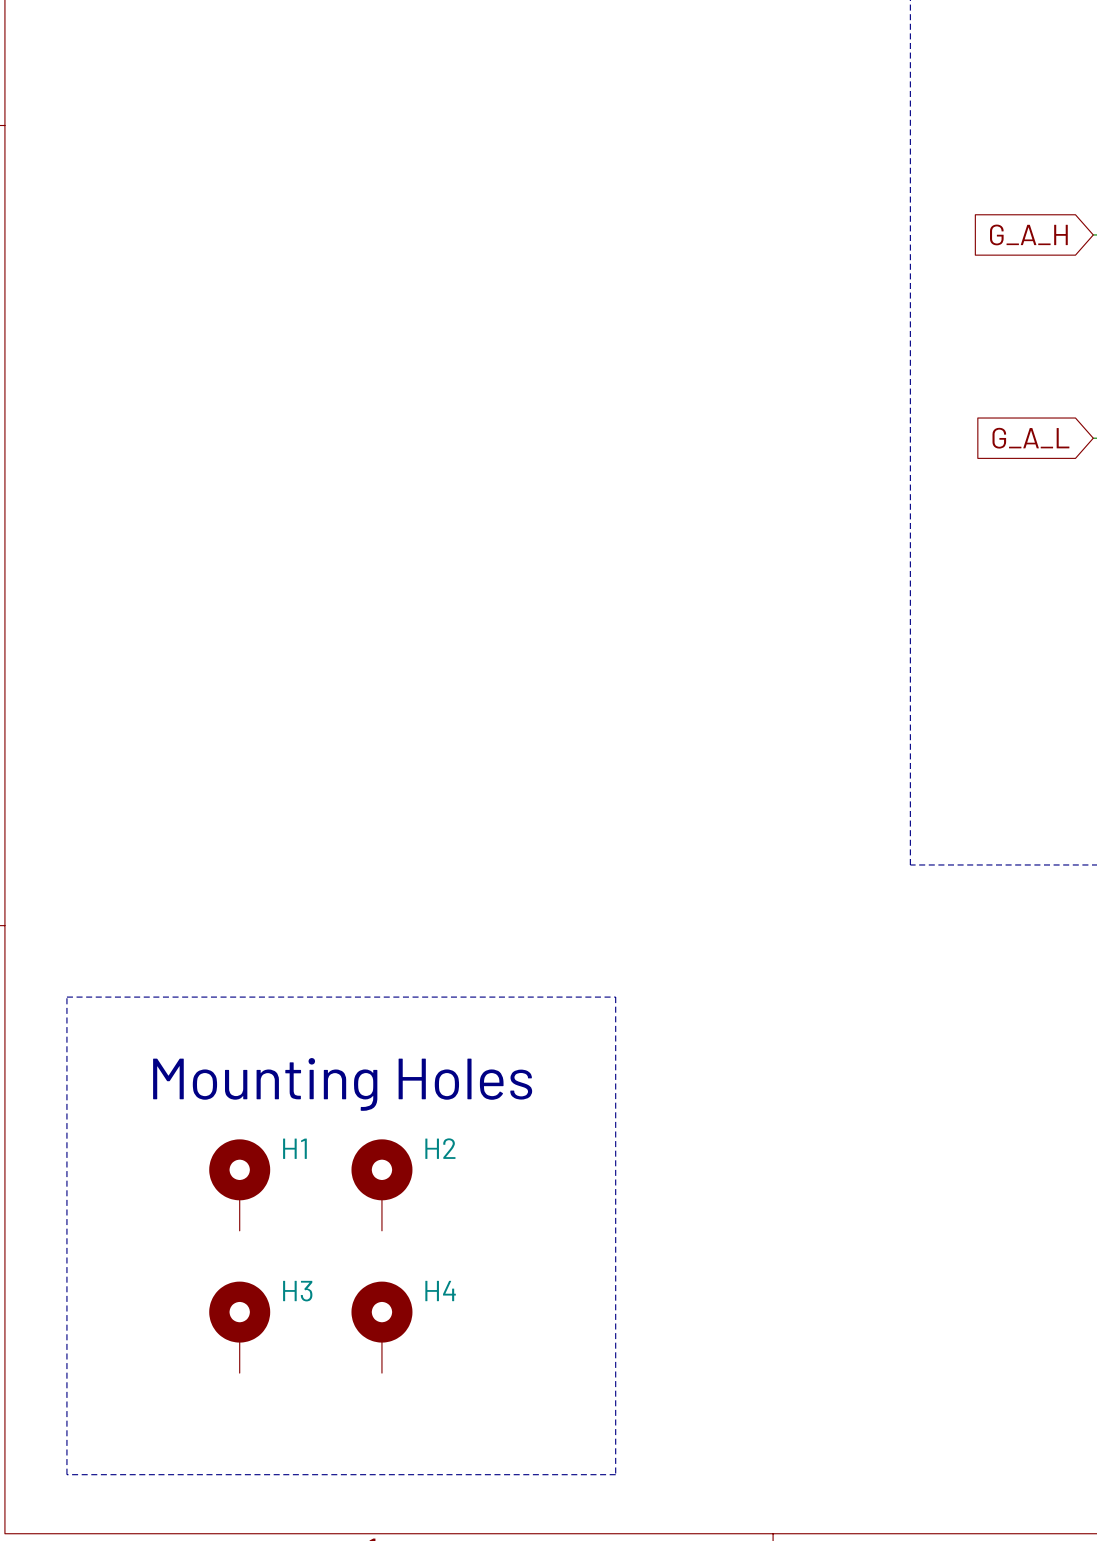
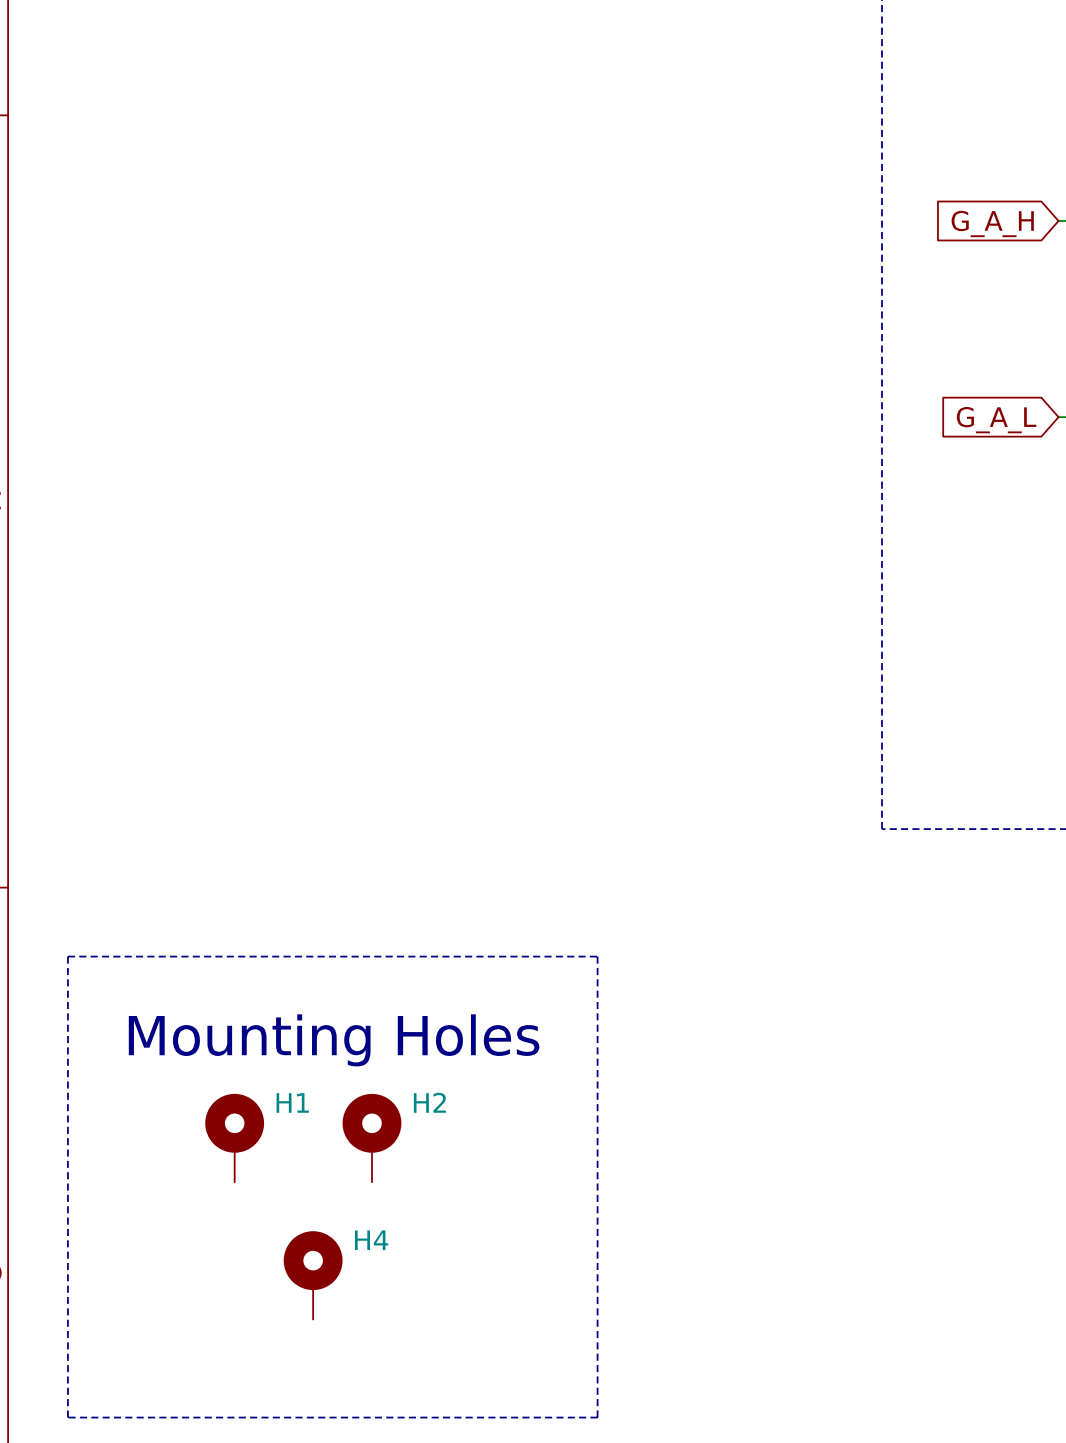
H3: (239, 1327) -> none
H4 position: (381, 1327) -> (313, 1275)

